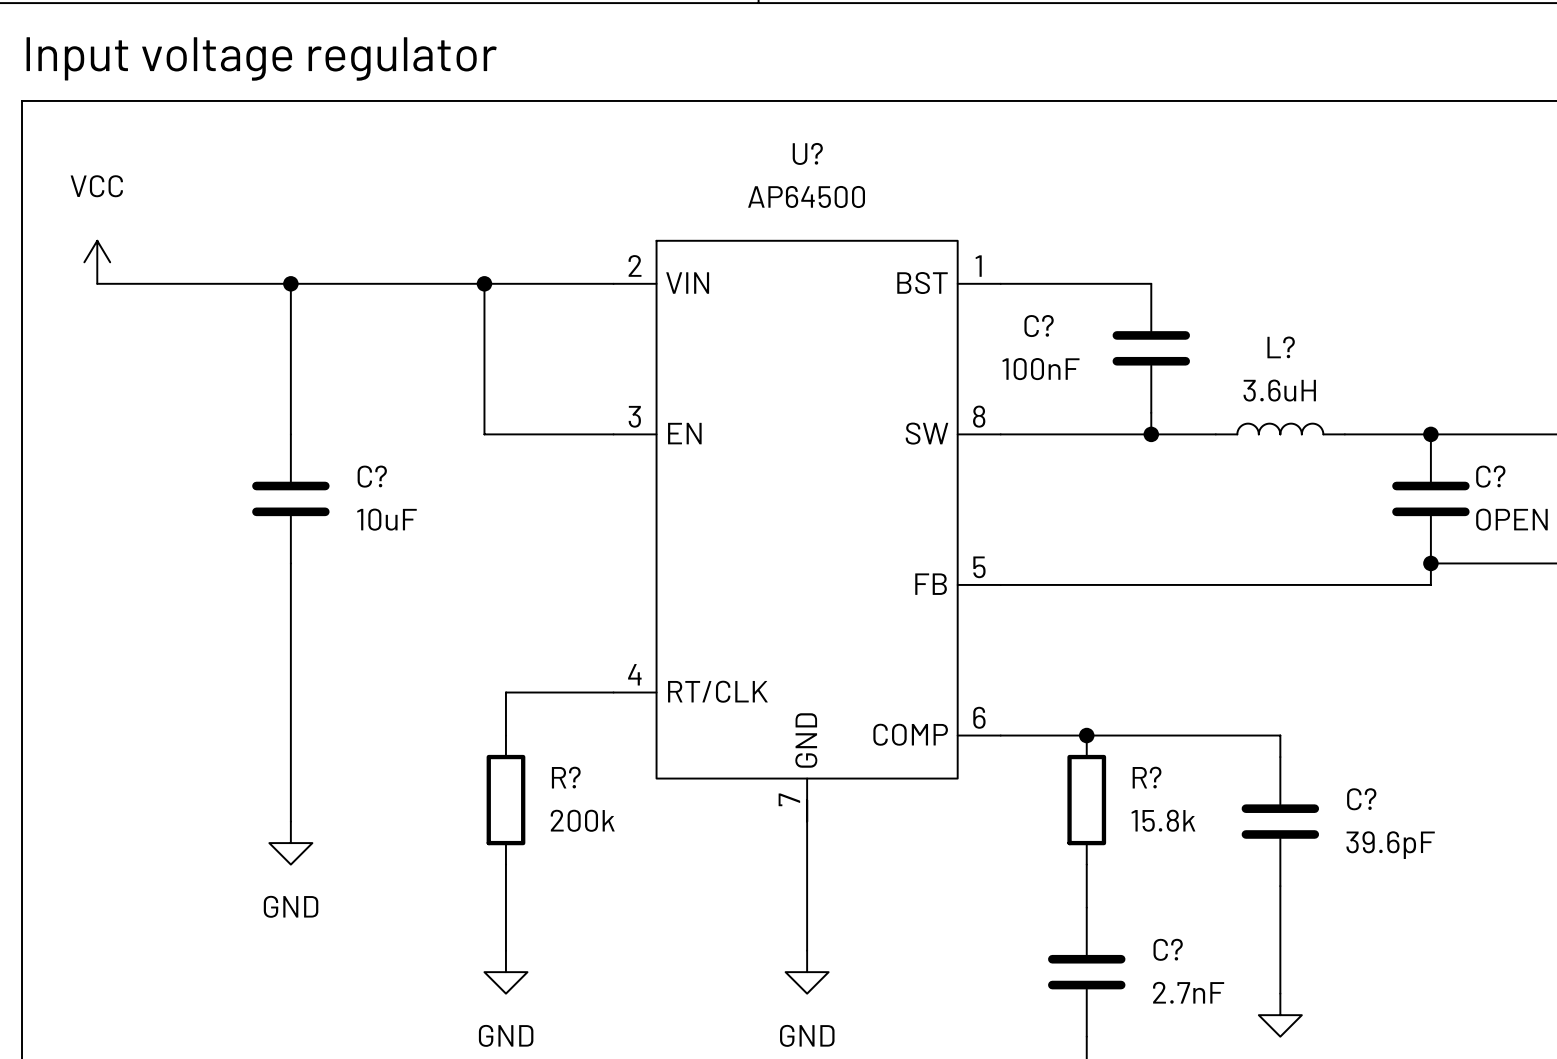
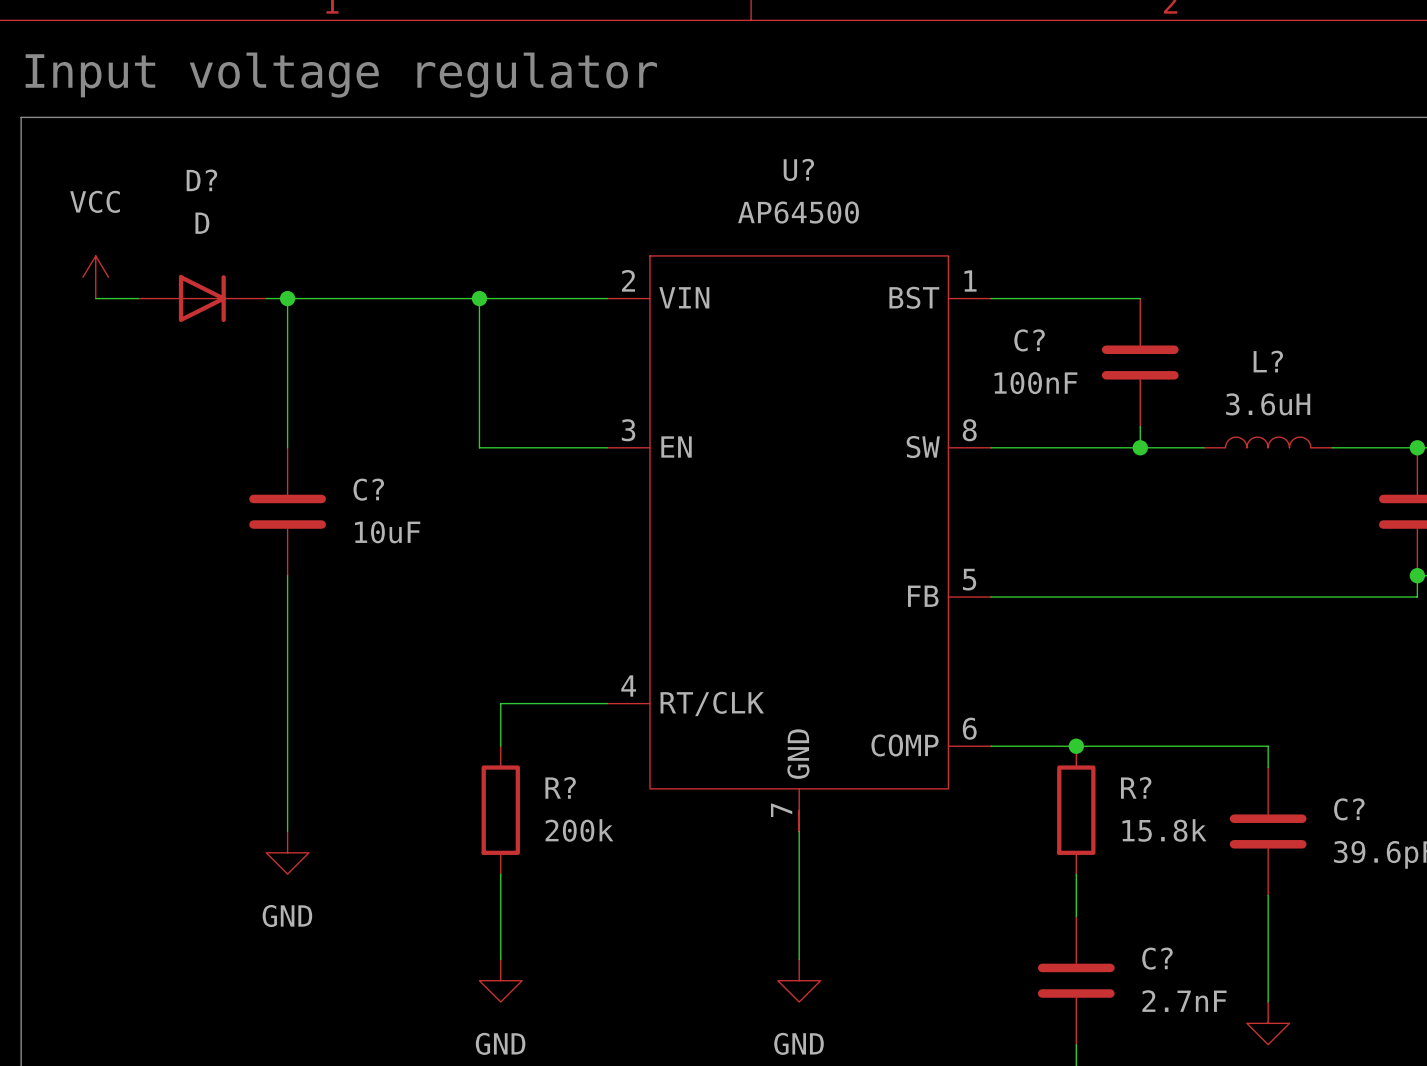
D?: none -> D (202, 298)

